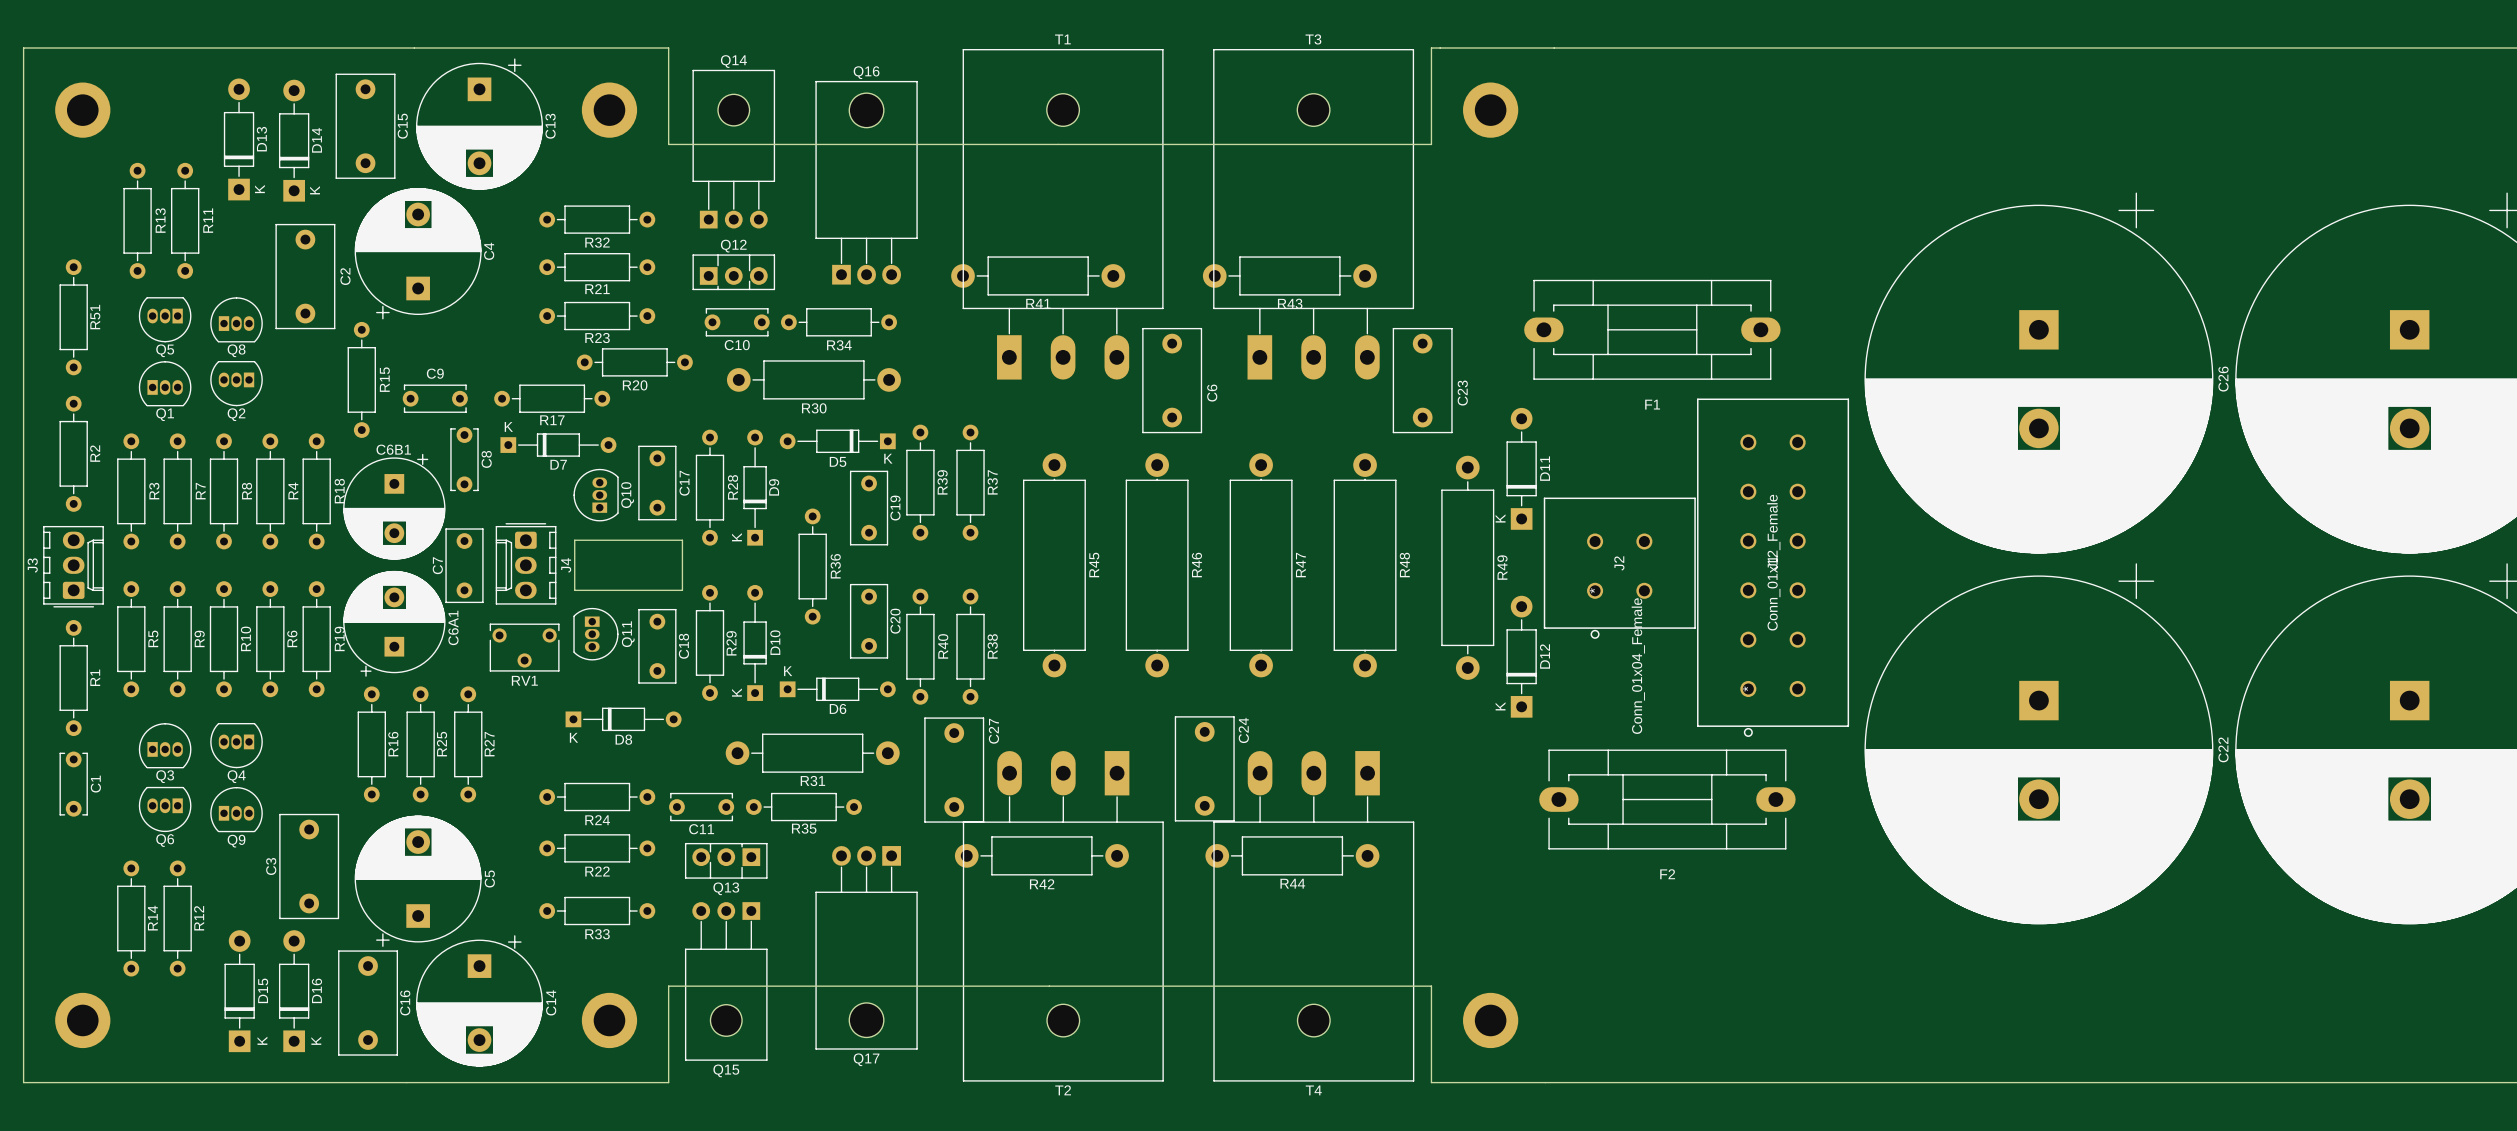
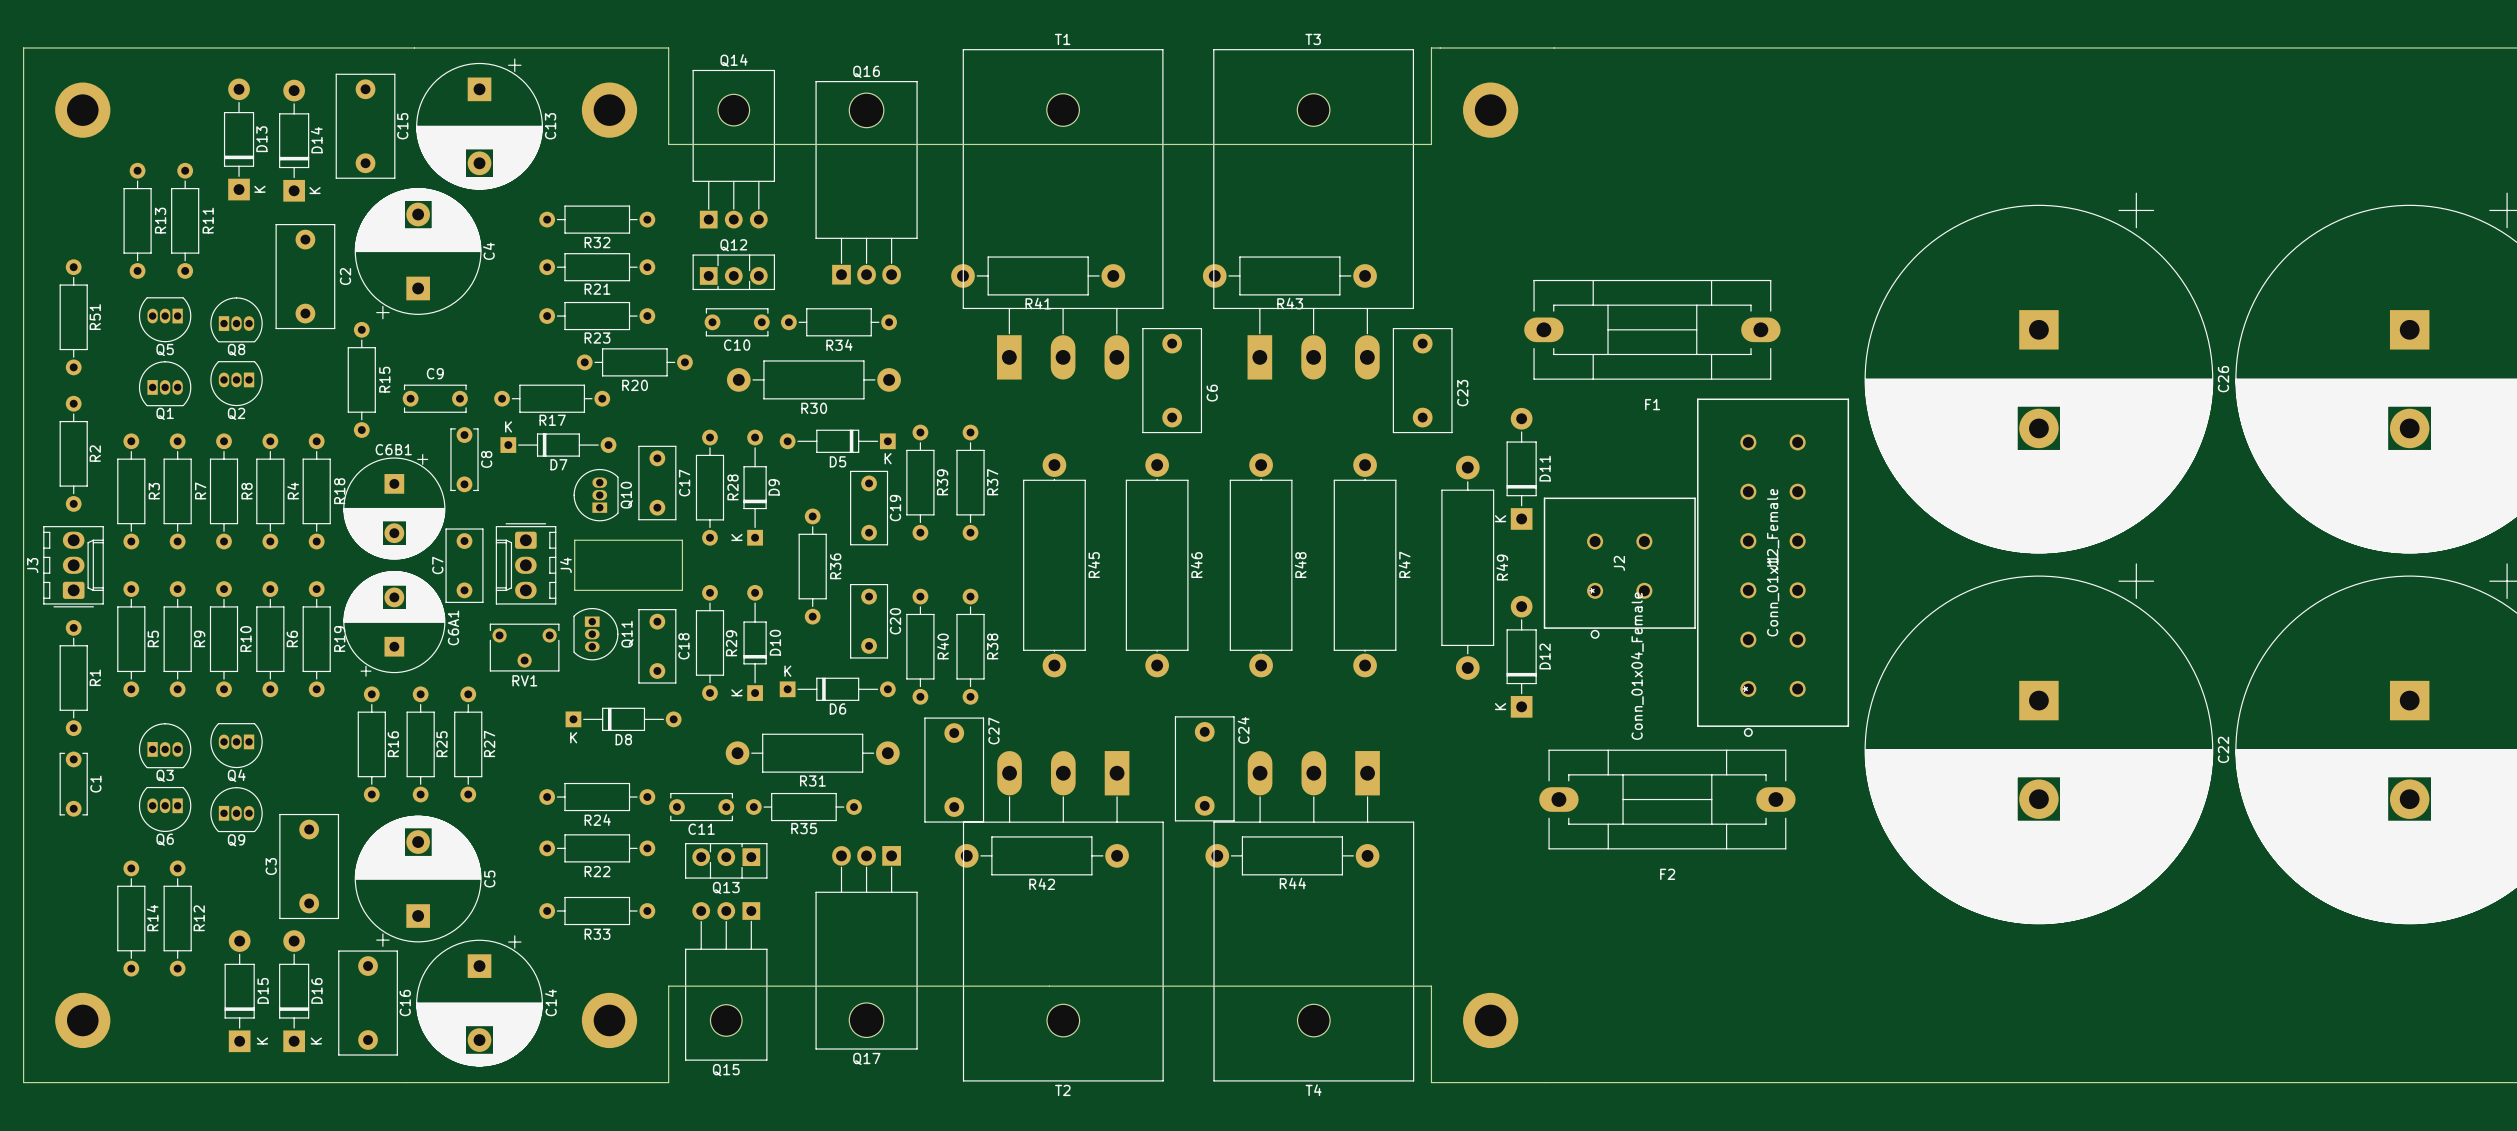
R47 name: R47 (1300, 565) -> R48 (1300, 565)
R48 name: R48 (1404, 565) -> R47 (1404, 564)

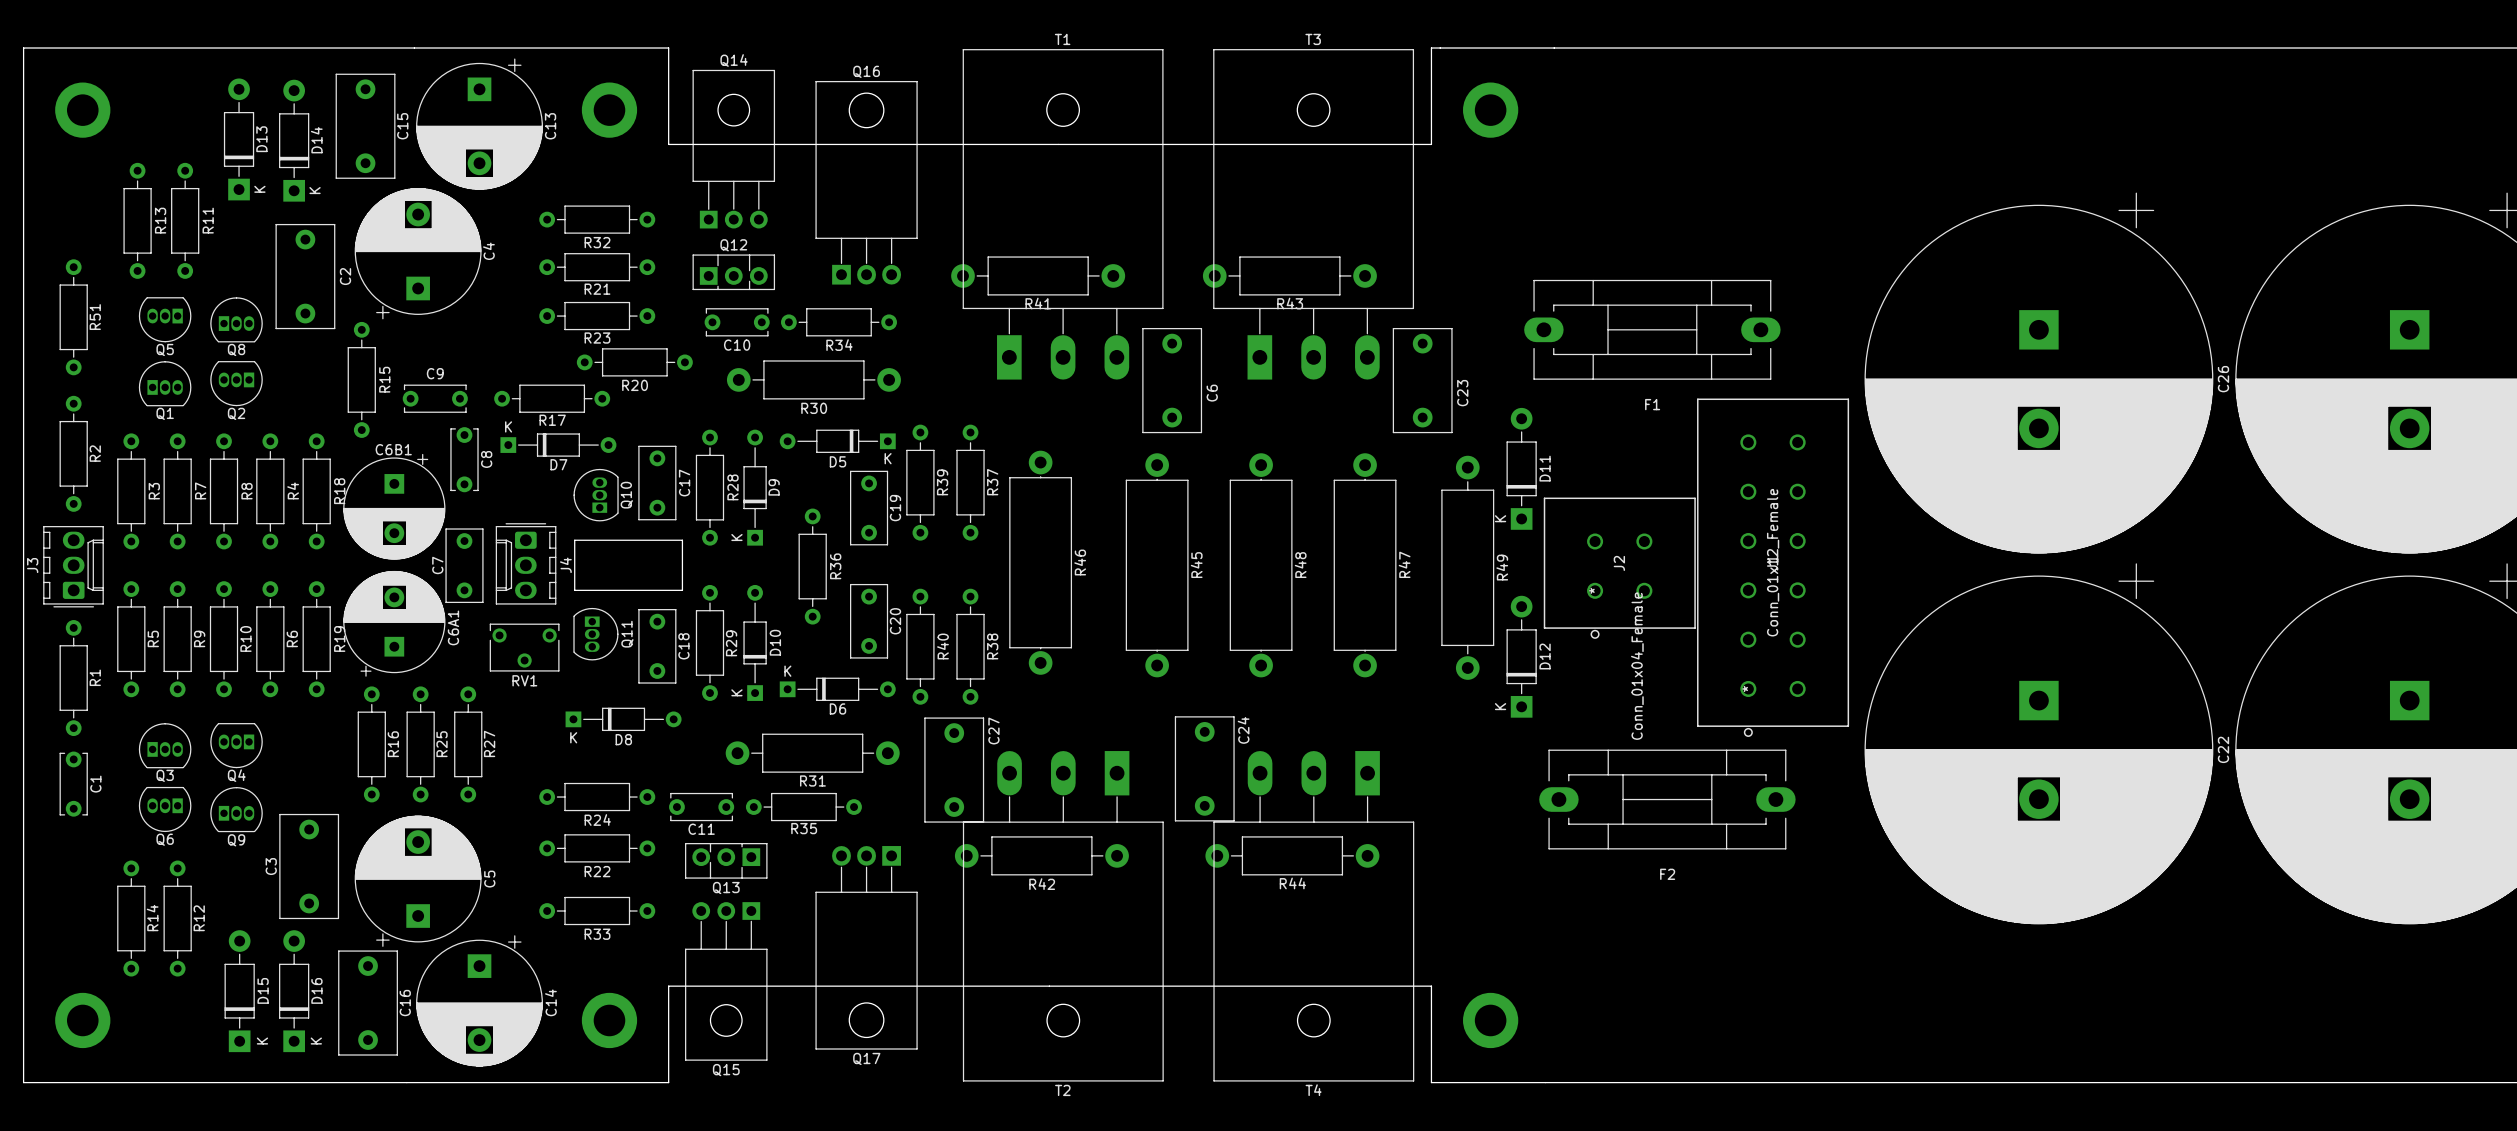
R46: none -> (1040, 562)
R45: (1054, 565) -> none
R46 name: R46 (1196, 565) -> R45 (1196, 565)

